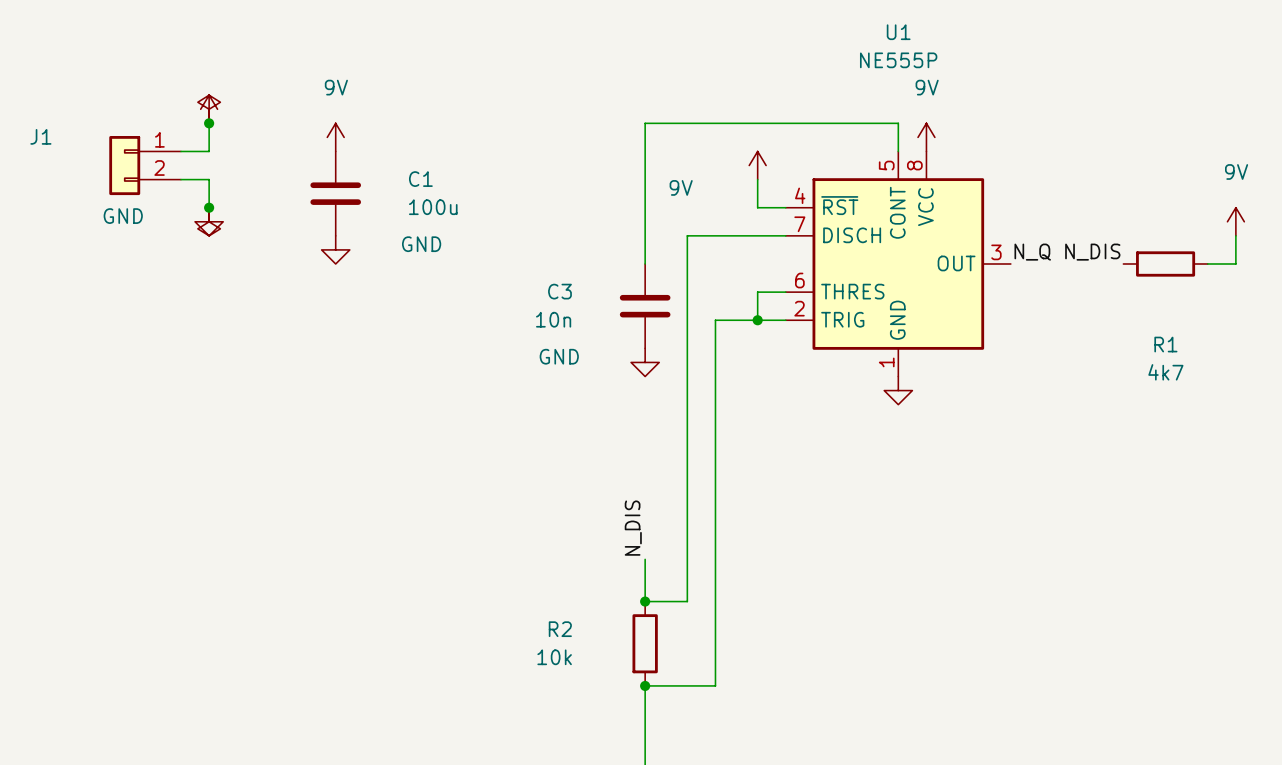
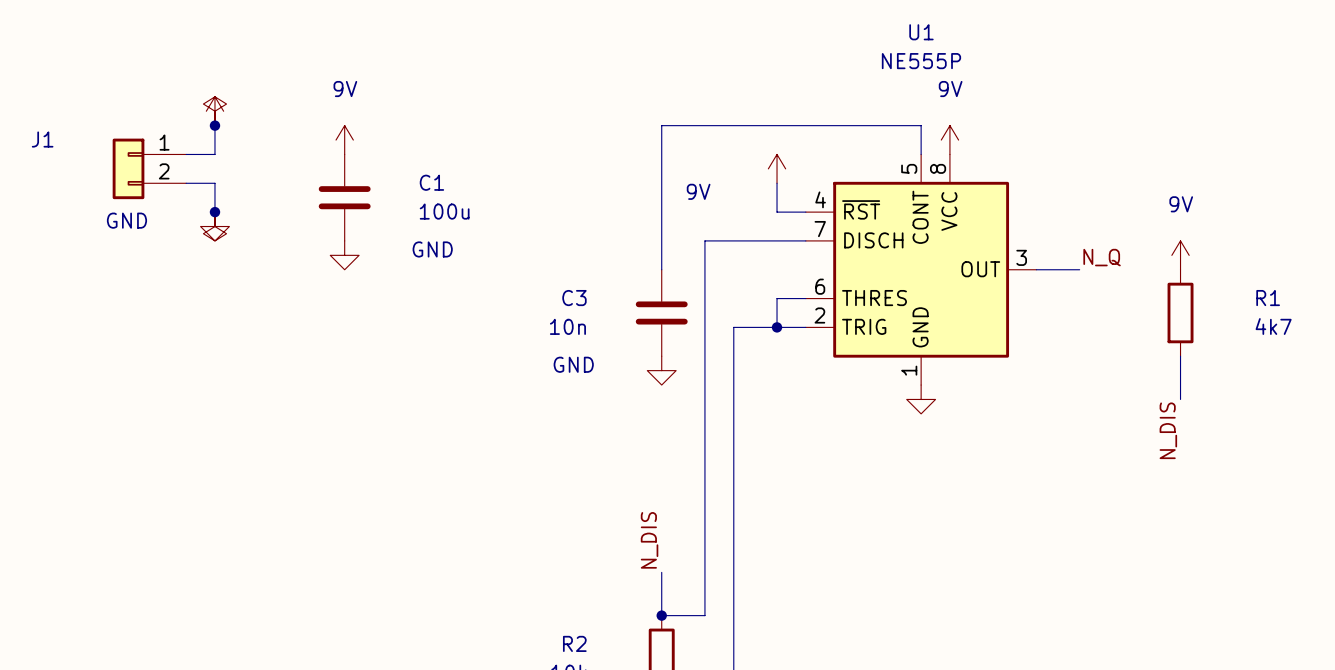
power symbol position: 9V (1235, 221) -> 9V (1180, 255)
wire: (1235, 235) (1235, 263) (1207, 263) -> none
label position: N_Q (1032, 252) -> N_Q (1102, 257)
label rotation: 0° (1092, 252) -> 90° counterclockwise (1168, 430)
label position: N_DIS (1092, 252) -> N_DIS (1168, 430)
wire: none -> (1036, 269) (1079, 269)
R1 rotation: 0° (1165, 263) -> 90° clockwise (1180, 312)
R1 name position: R1 (1165, 344) -> R1 (1268, 298)
wire: none -> (1180, 356) (1180, 399)
R1 value position: 4k7 (1165, 372) -> 4k7 (1273, 326)

